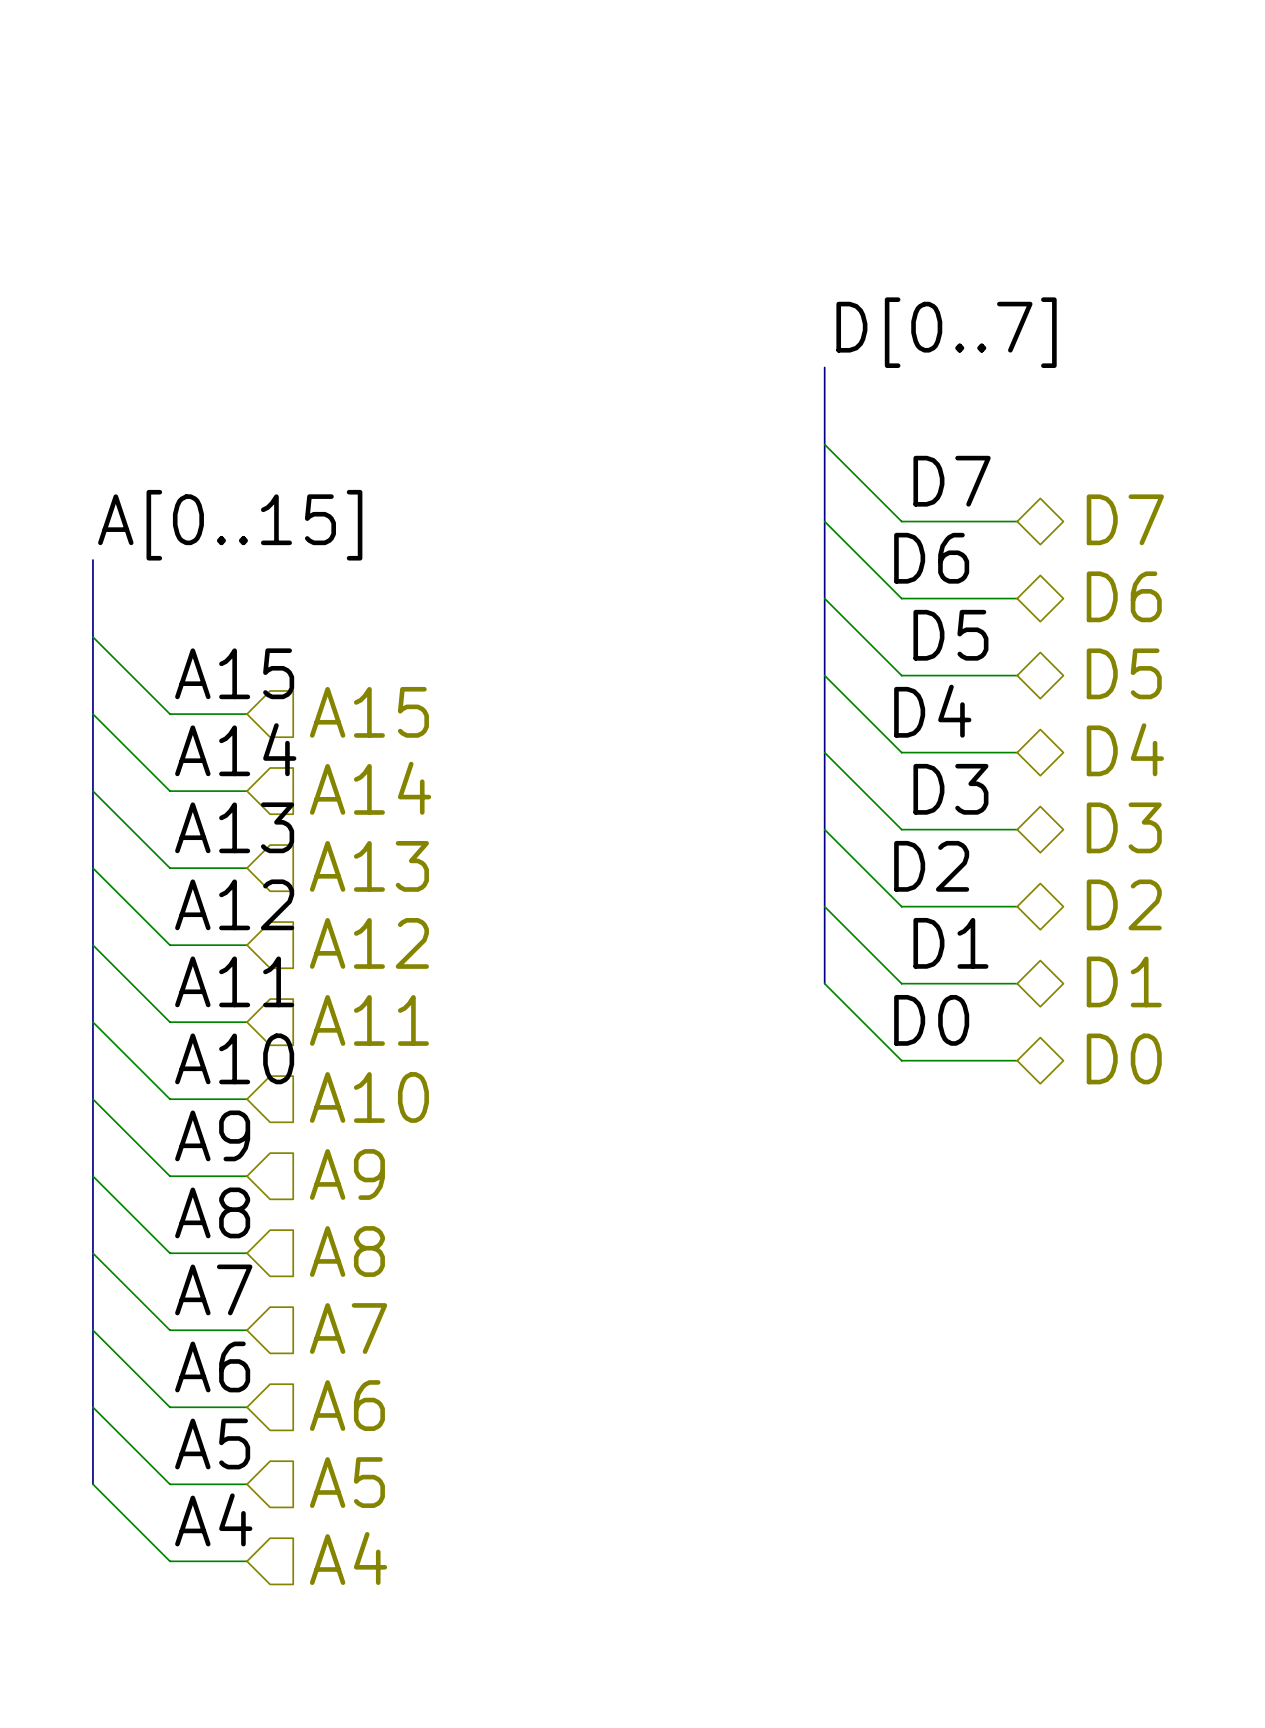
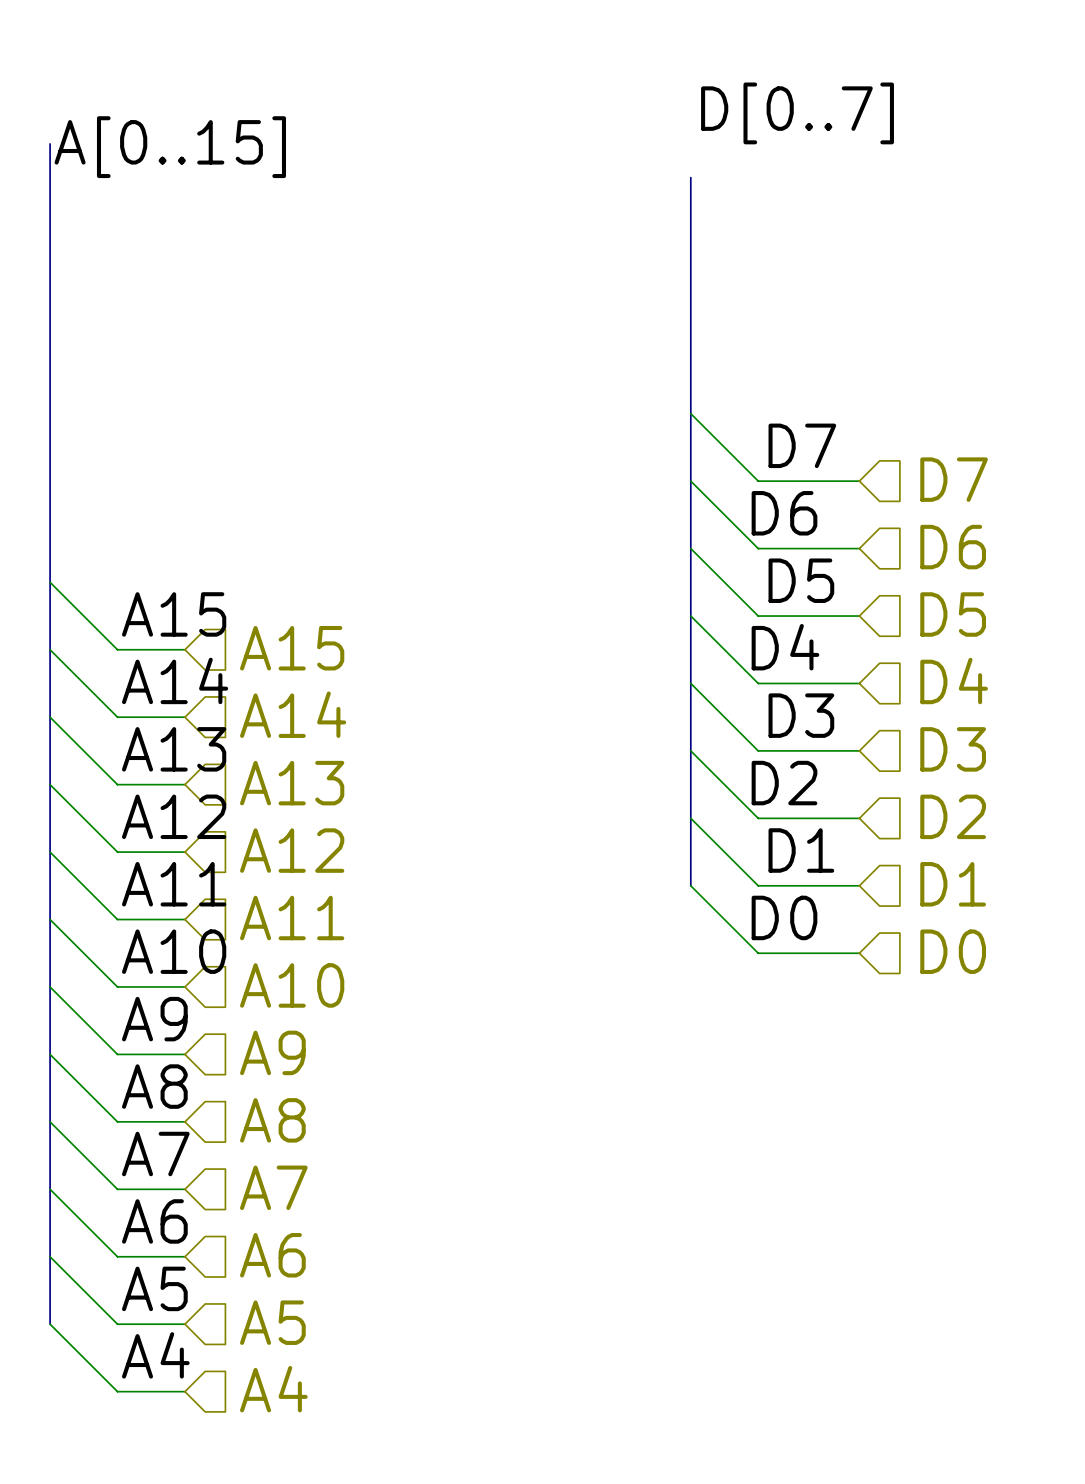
bus: none -> (50, 143) (50, 514)
bus: none -> (690, 177) (690, 346)
label position: D[0..7] (946, 332) -> D[0..7] (797, 113)
hierarchical label shape: bidirectional (1125, 519) -> input (954, 479)
label position: A[0..15] (230, 525) -> A[0..15] (170, 147)
hierarchical label shape: bidirectional (1124, 596) -> input (953, 547)
hierarchical label shape: bidirectional (1124, 673) -> input (953, 614)
hierarchical label shape: bidirectional (1125, 749) -> input (954, 680)
hierarchical label shape: bidirectional (1124, 827) -> input (953, 749)
hierarchical label shape: bidirectional (1124, 904) -> input (953, 816)
hierarchical label shape: bidirectional (1124, 981) -> input (953, 884)
hierarchical label shape: bidirectional (1124, 1058) -> input (953, 951)

